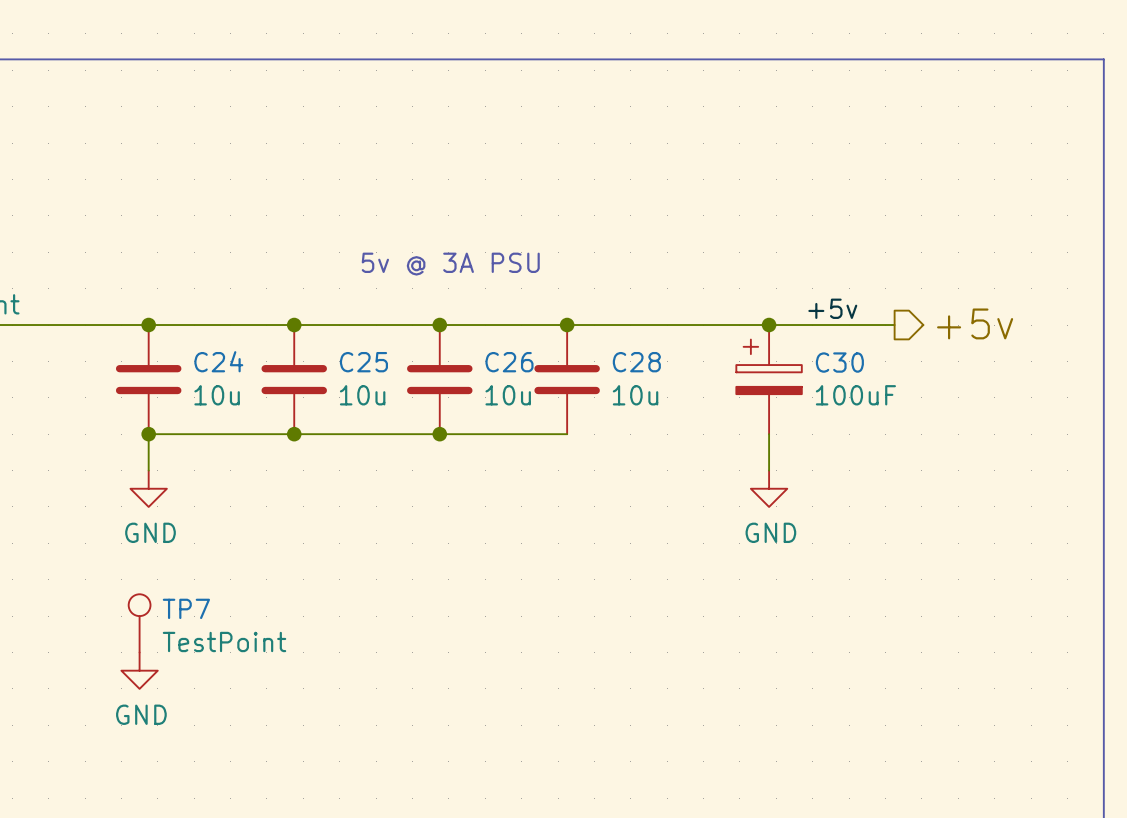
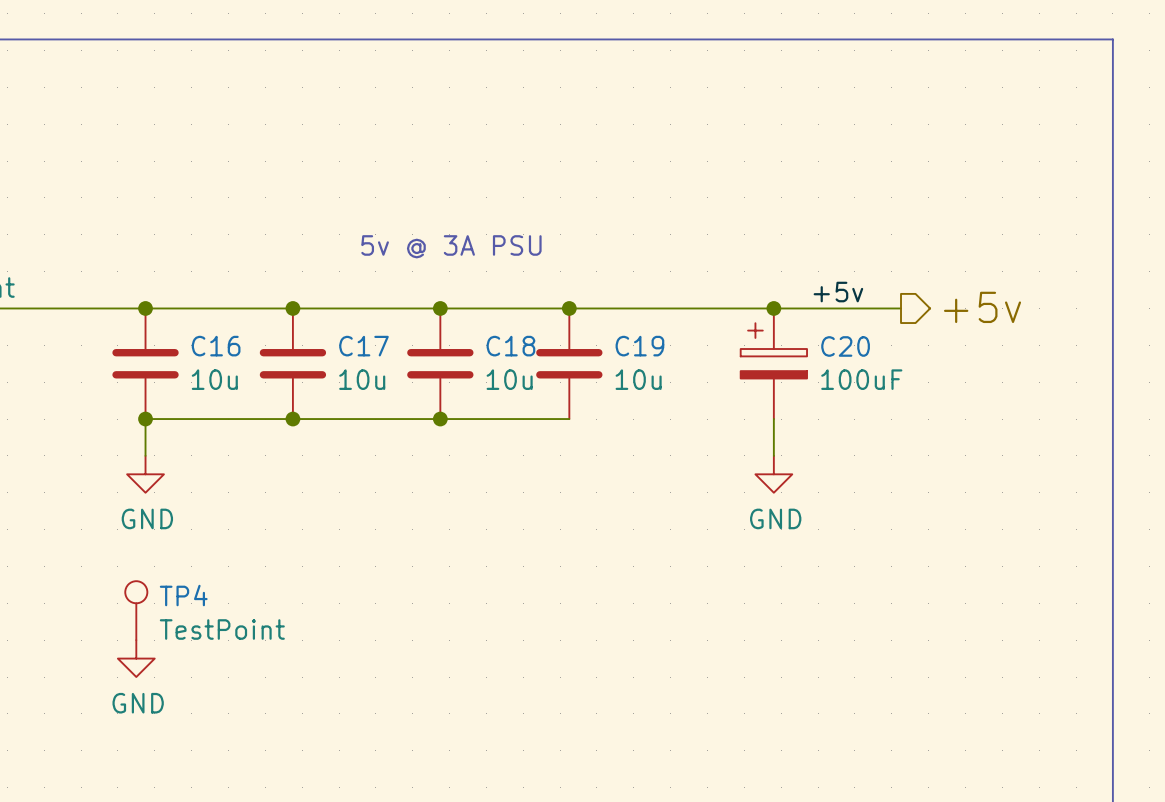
C24 name: C24 (218, 361) -> C16 (216, 346)
C25 name: C25 (363, 362) -> C17 (363, 346)
C26 name: C26 (509, 362) -> C18 (510, 346)
C28 name: C28 (636, 362) -> C19 (639, 346)
C30 name: C30 (839, 362) -> C20 (845, 346)
TP7 name: TP7 (186, 608) -> TP4 (183, 595)

